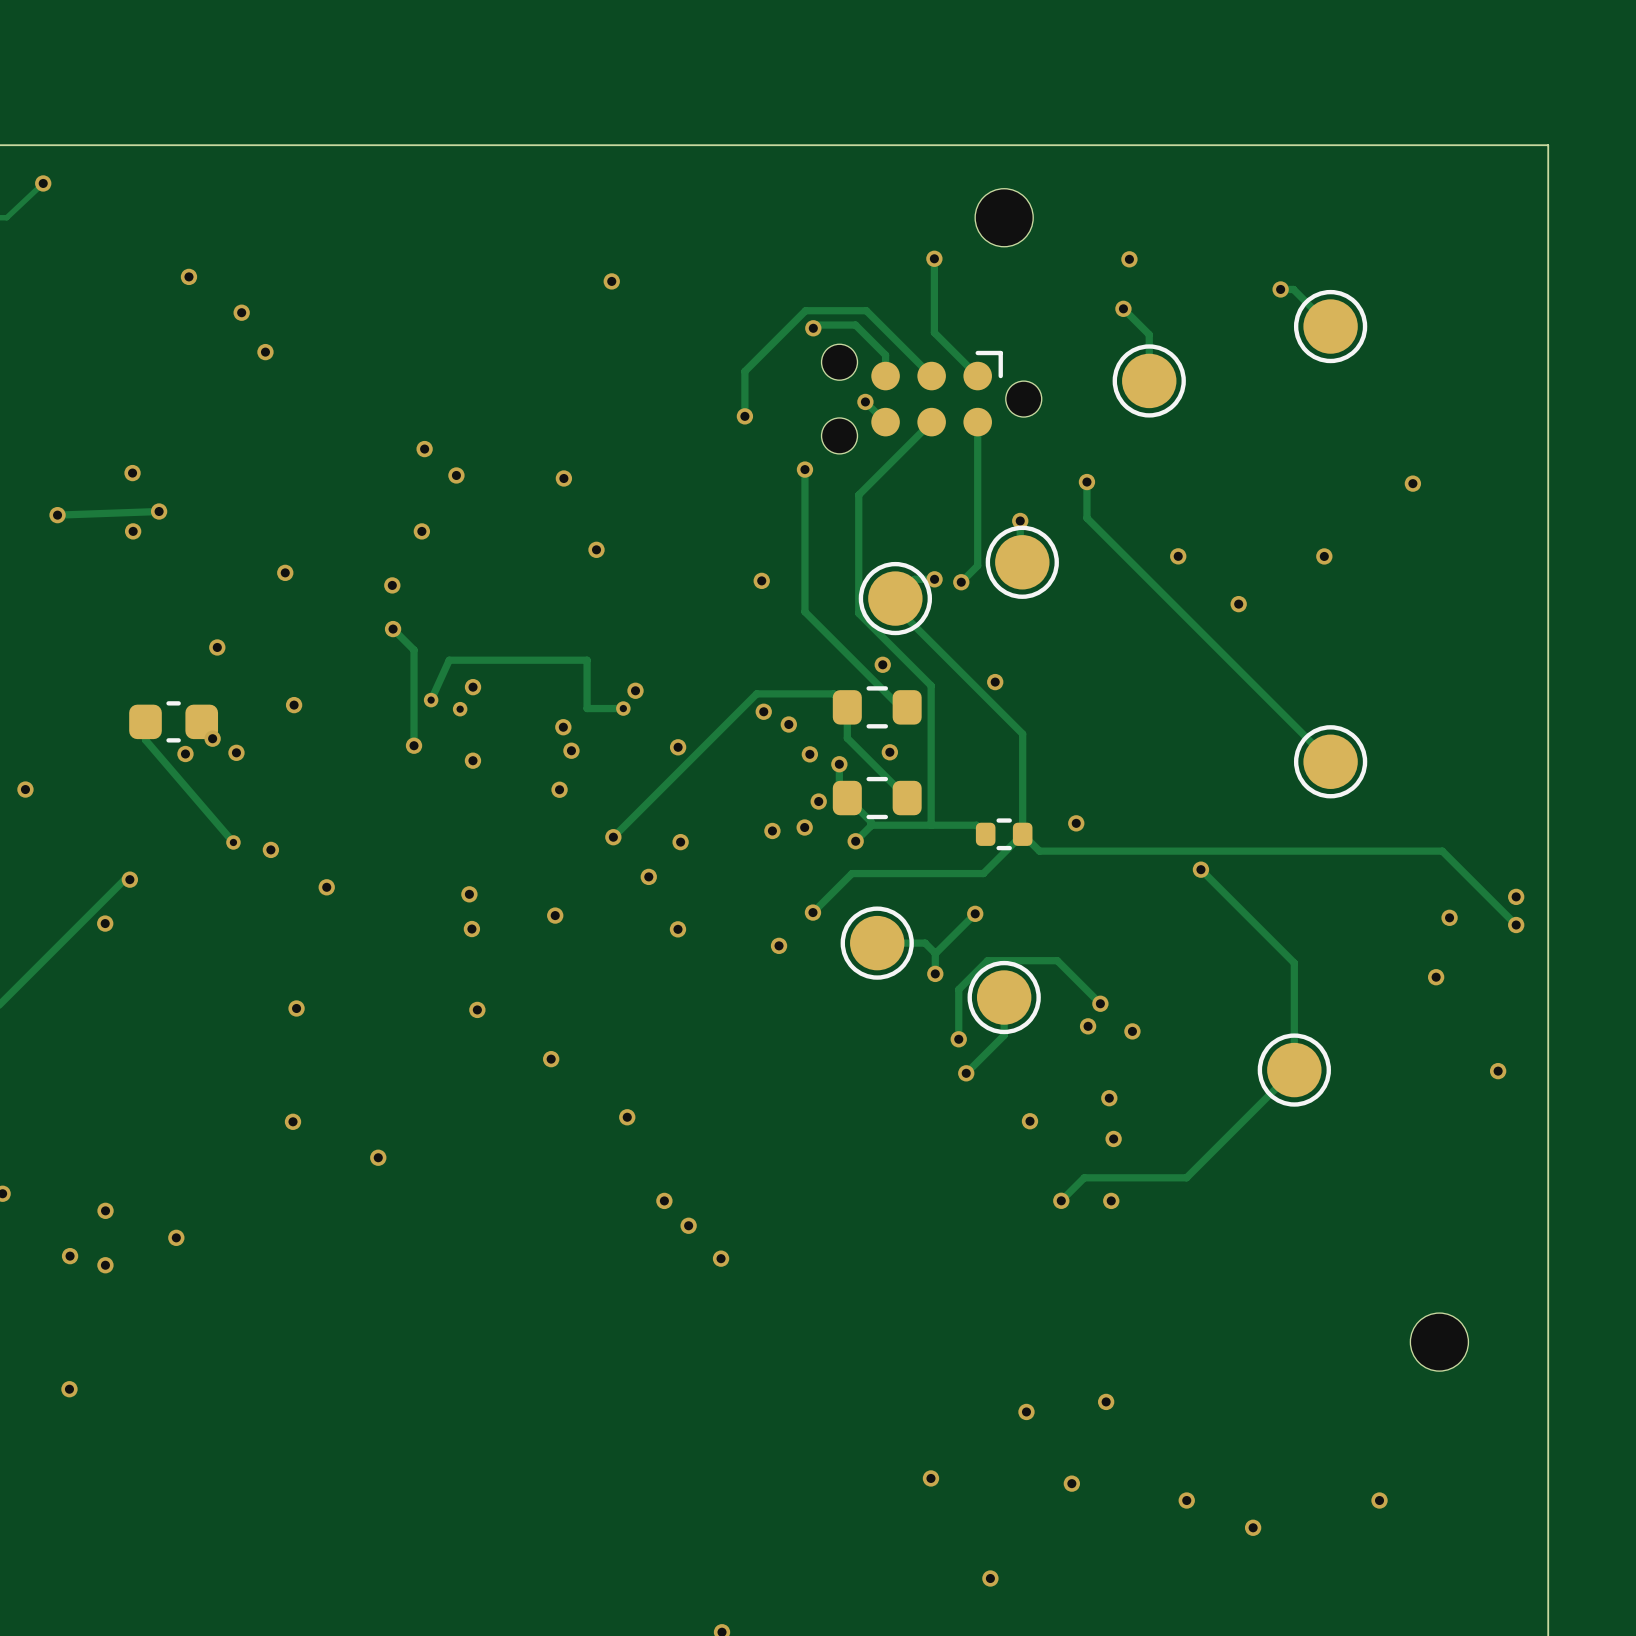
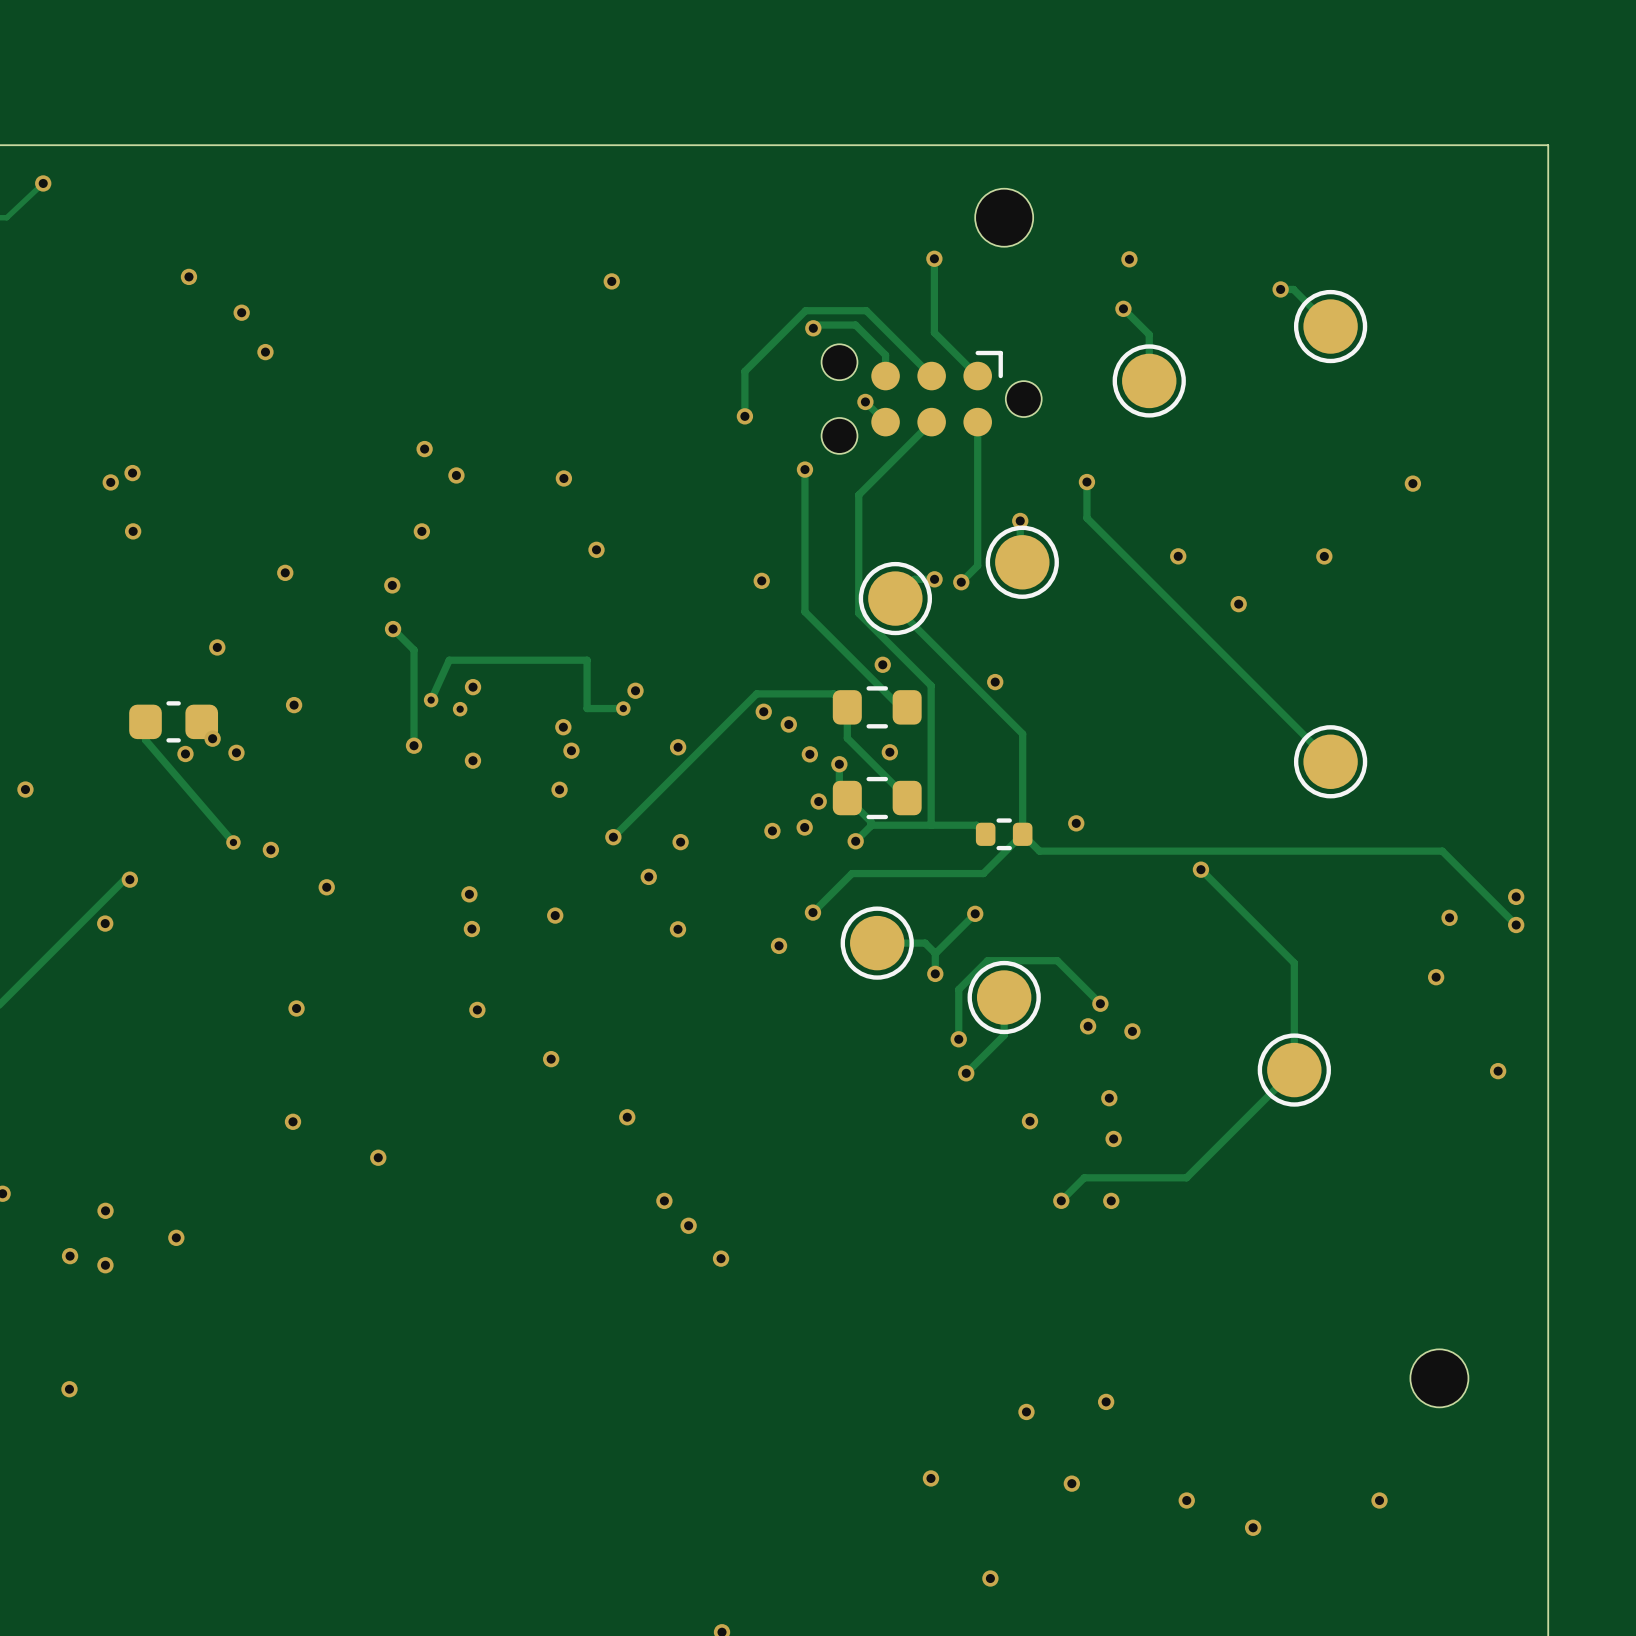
via: none -> (110, 482)
track: (159, 511) (57, 515) -> none
via: (159, 511) -> none
via: (57, 515) -> none
part position: (1439, 1342) -> (1439, 1378)

